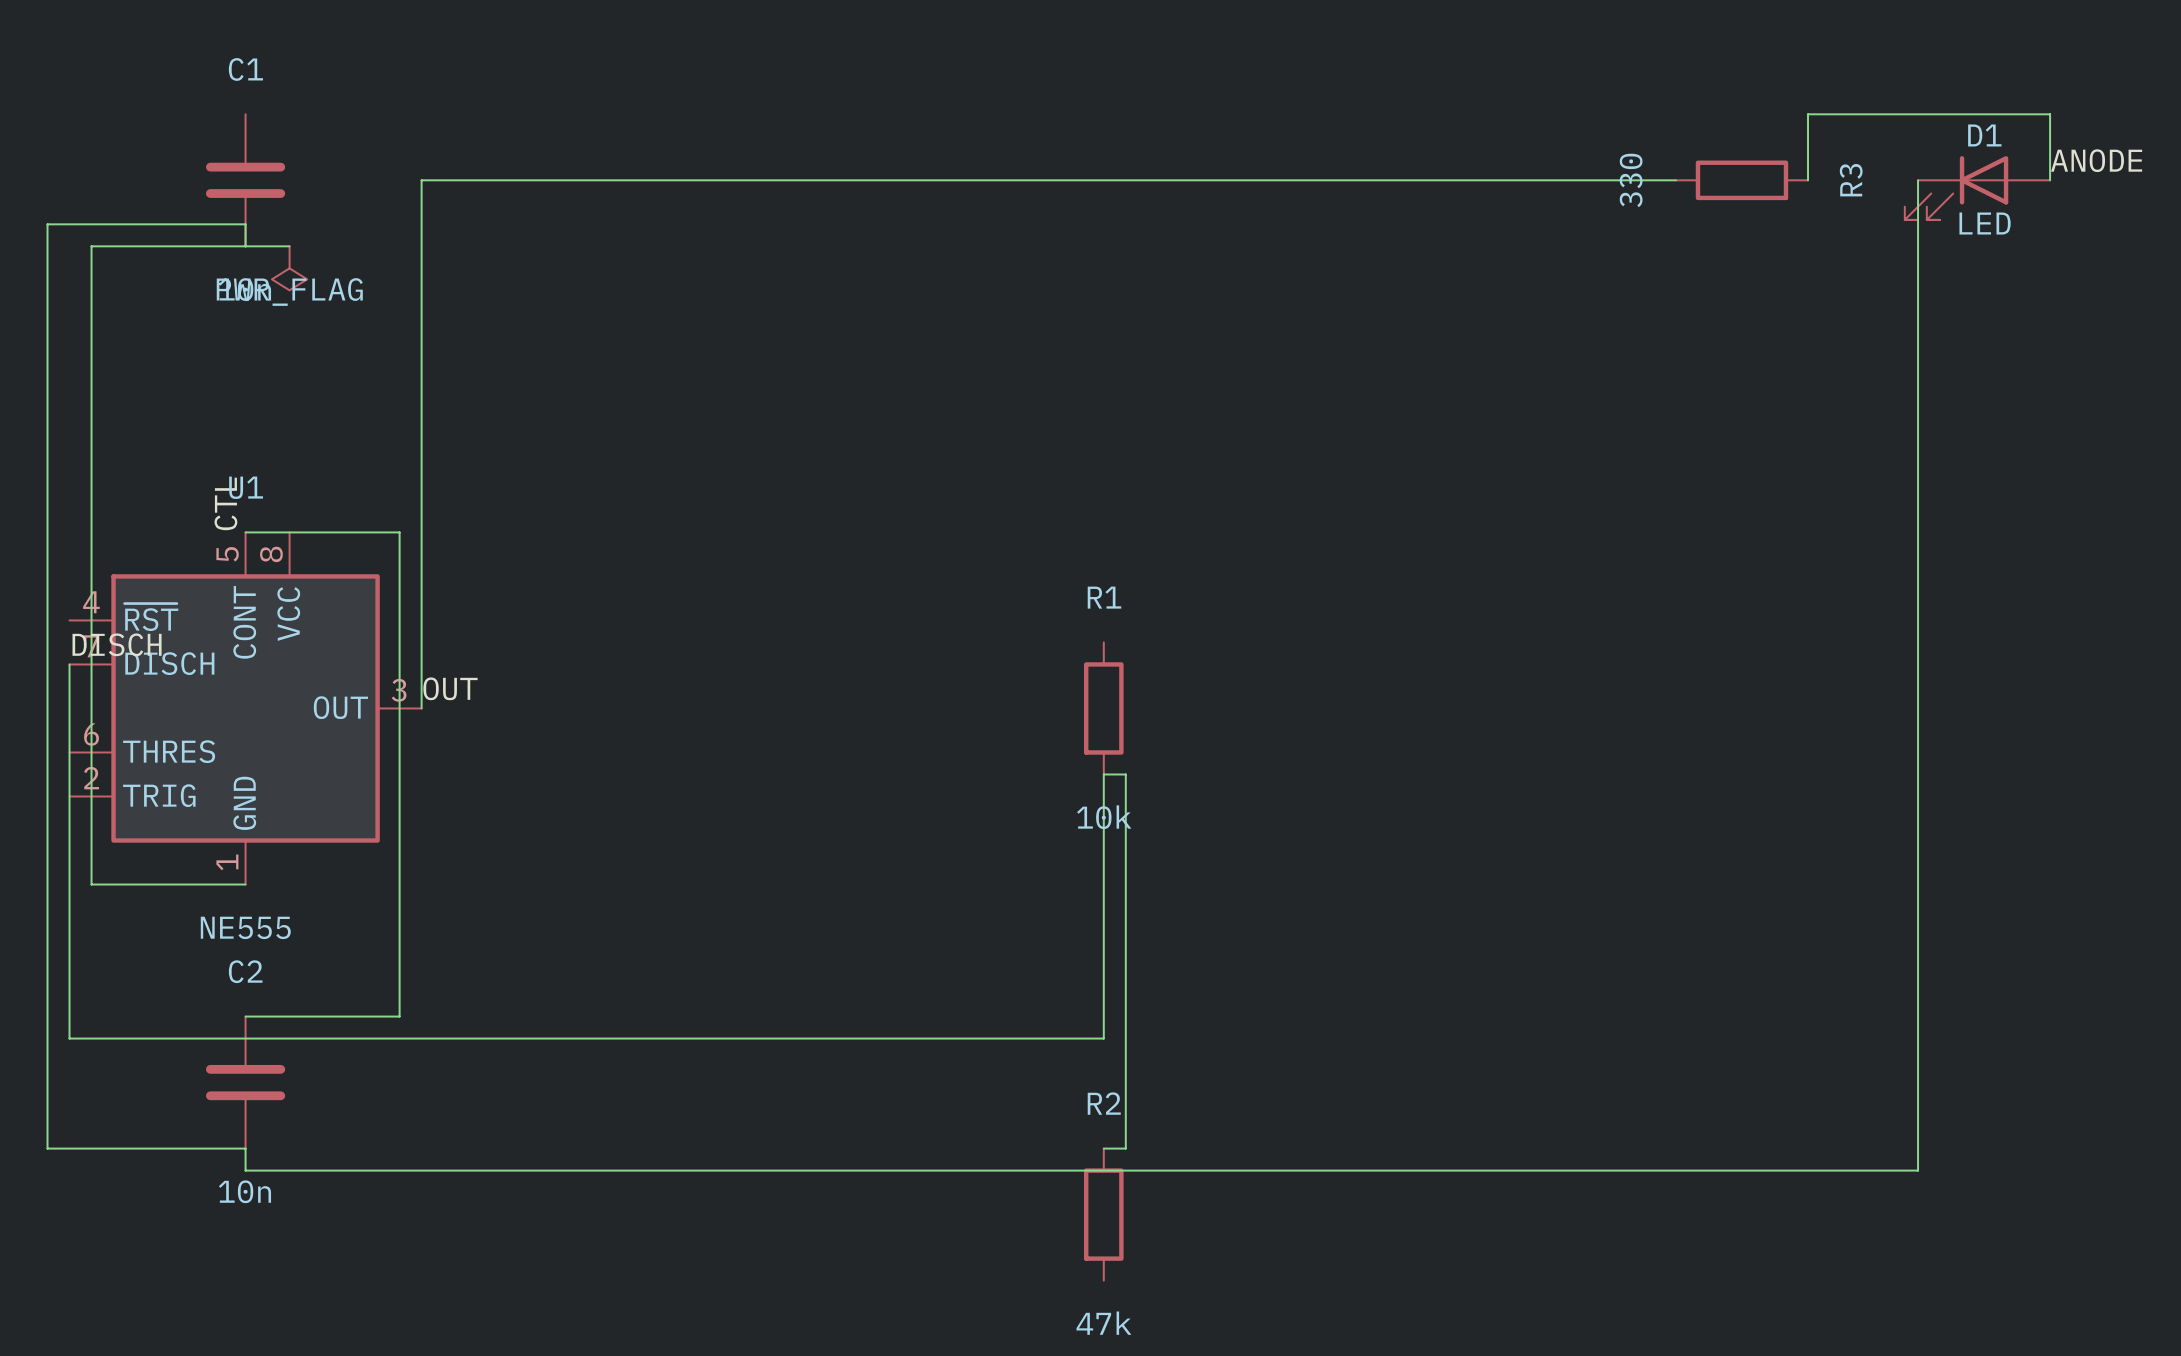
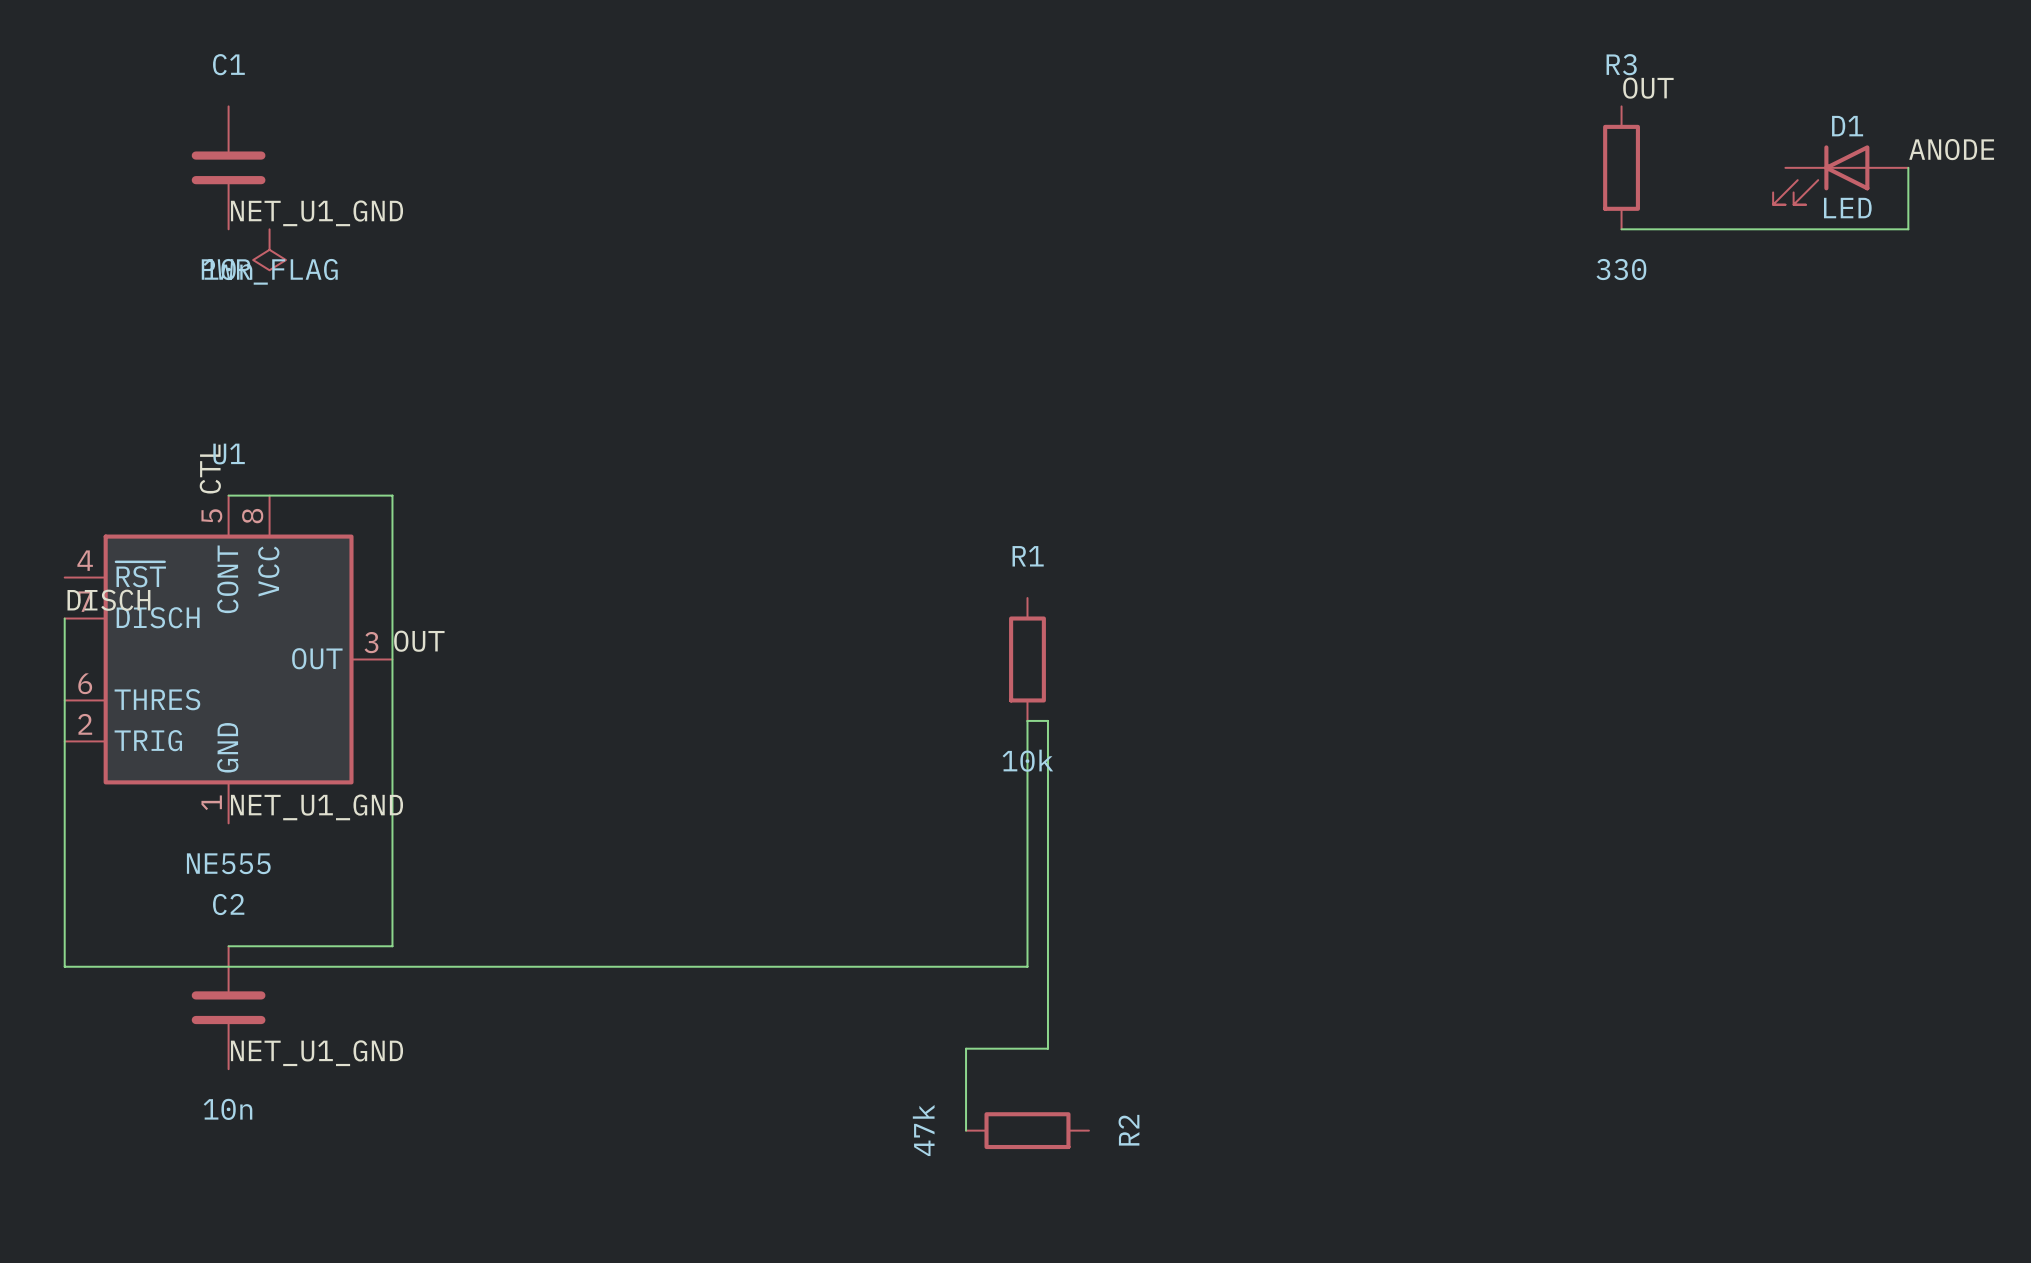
label: none -> OUT (1648, 88)
R3 value position: 330 (1631, 180) -> 330 (1621, 269)
wire: (1675, 180) (421, 180) (421, 532) -> (371, 495) (392, 495)
R3 rotation: 0° (1741, 180) -> 90° clockwise (1621, 167)
wire: (1808, 180) (1808, 114) (2050, 114) (2050, 180) -> (1621, 229) (1908, 229) (1908, 167)
R3 name position: R3 (1851, 180) -> R3 (1621, 64)
wire: (1918, 180) (1918, 1170) (245, 1170) (245, 1148) (47, 1148) (47, 224) (245, 224) (245, 246) -> none
label: none -> NET_U1_GND (316, 213)
wire: (289, 246) (91, 246) (91, 884) (245, 884) -> none
wire: (399, 532) (399, 1016) -> (392, 659) (392, 946) (371, 946)
label: none -> NET_U1_GND (316, 807)
wire: (1125, 1126) (1125, 1148) (1103, 1148) -> (1047, 1048) (966, 1048) (966, 1130)
label: none -> NET_U1_GND (316, 1053)
R2 rotation: 0° (1103, 1214) -> 90° clockwise (1027, 1130)

